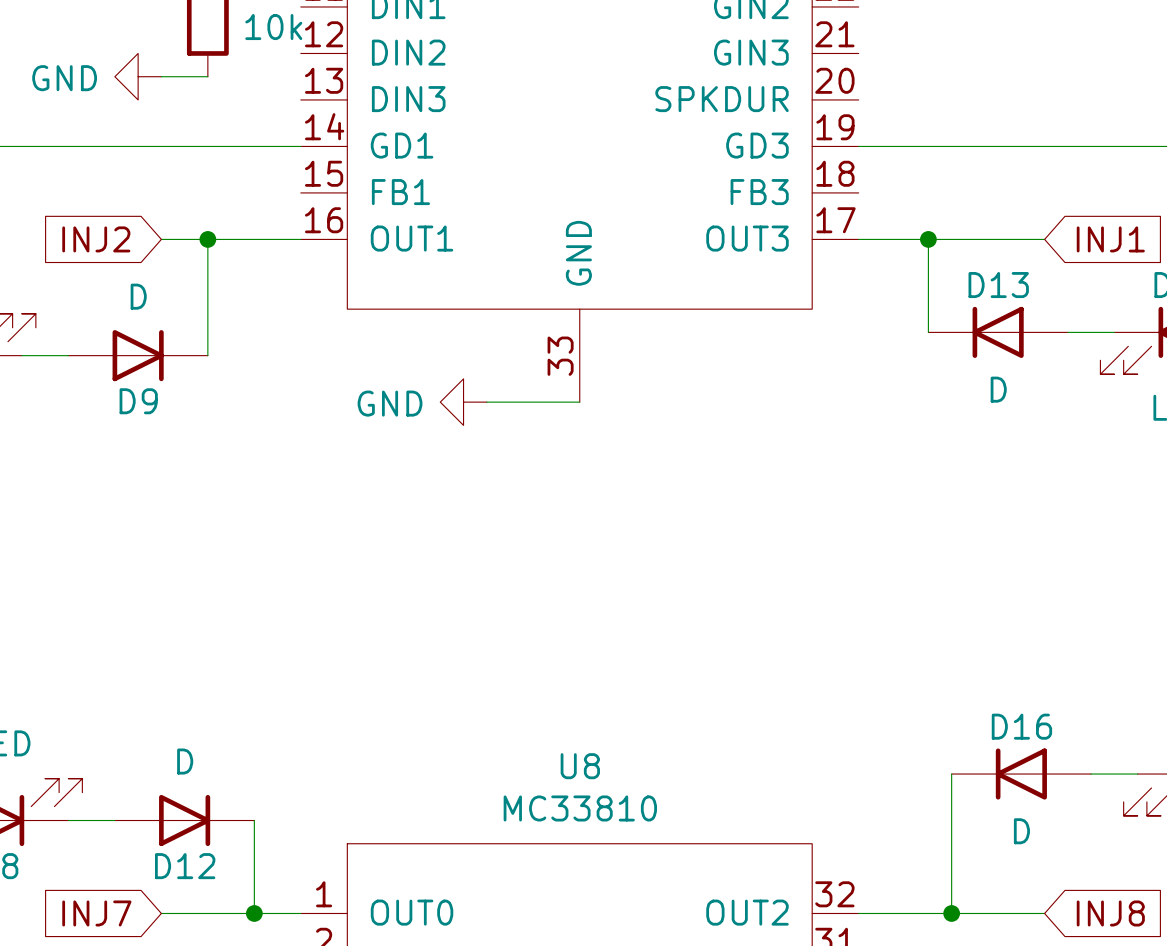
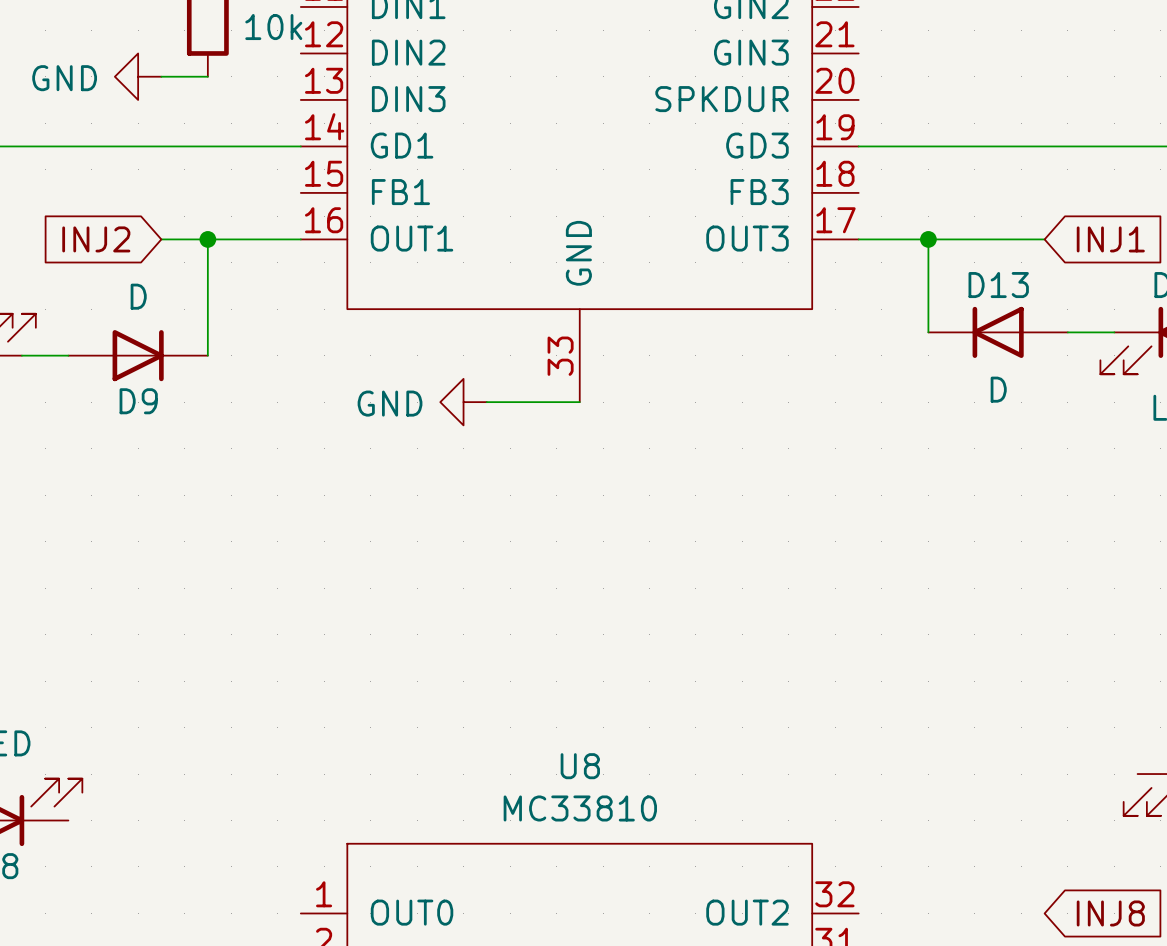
wire: (951, 774) (951, 913) -> none
D16: D (1021, 774) -> none
wire: (1091, 774) (1137, 774) -> none
wire: (68, 820) (114, 820) -> none
D12: D (184, 820) -> none
wire: (254, 820) (254, 913) -> none
global label: INJ7 (96, 913) -> none
wire: (161, 913) (300, 913) -> none
junction: (254, 913) -> none
wire: (858, 913) (1044, 913) -> none
junction: (951, 913) -> none

